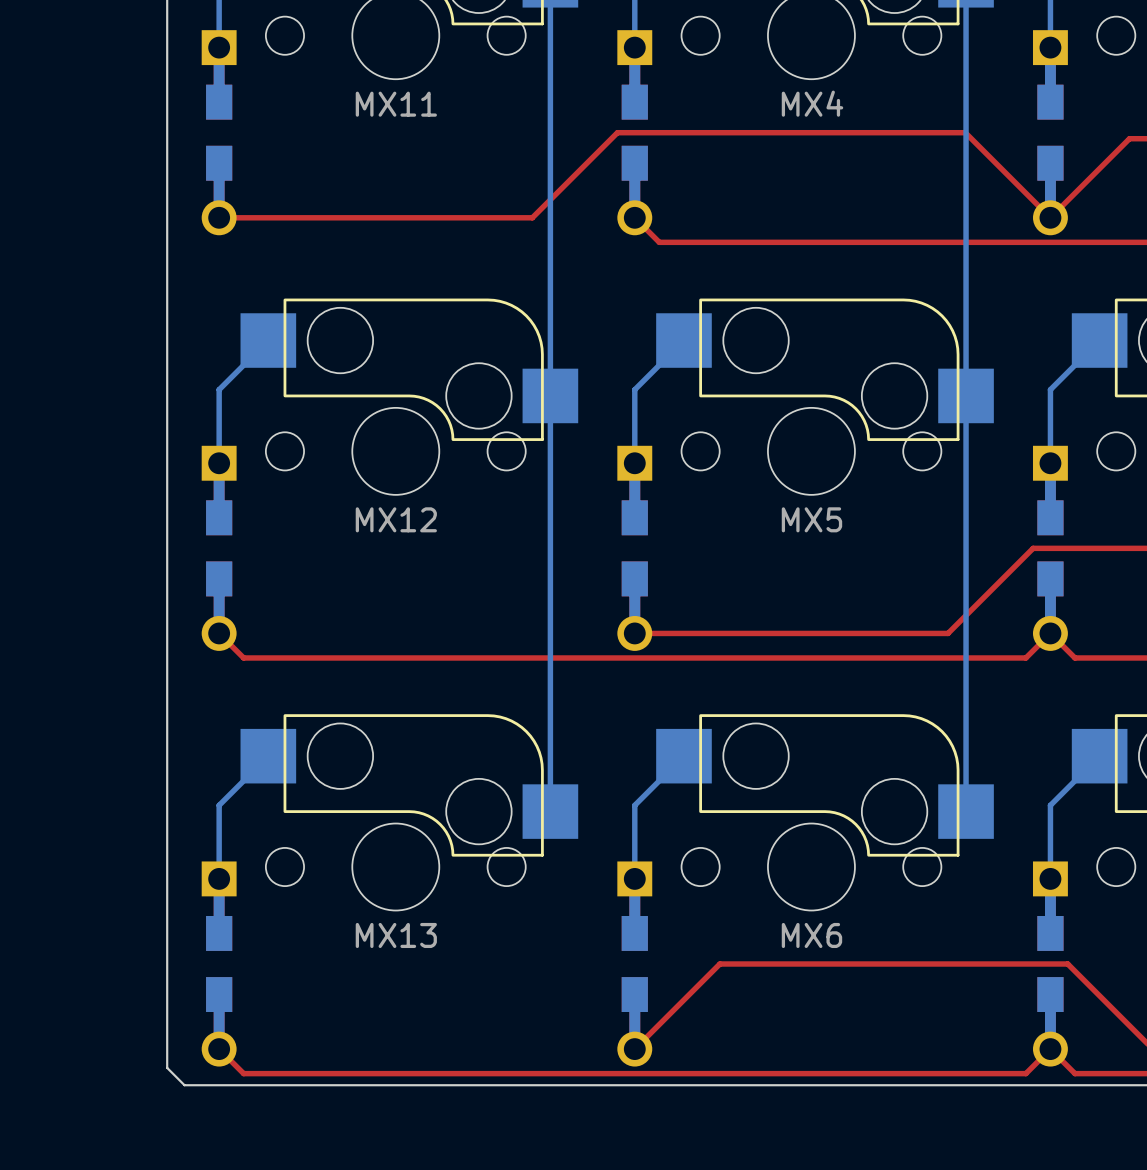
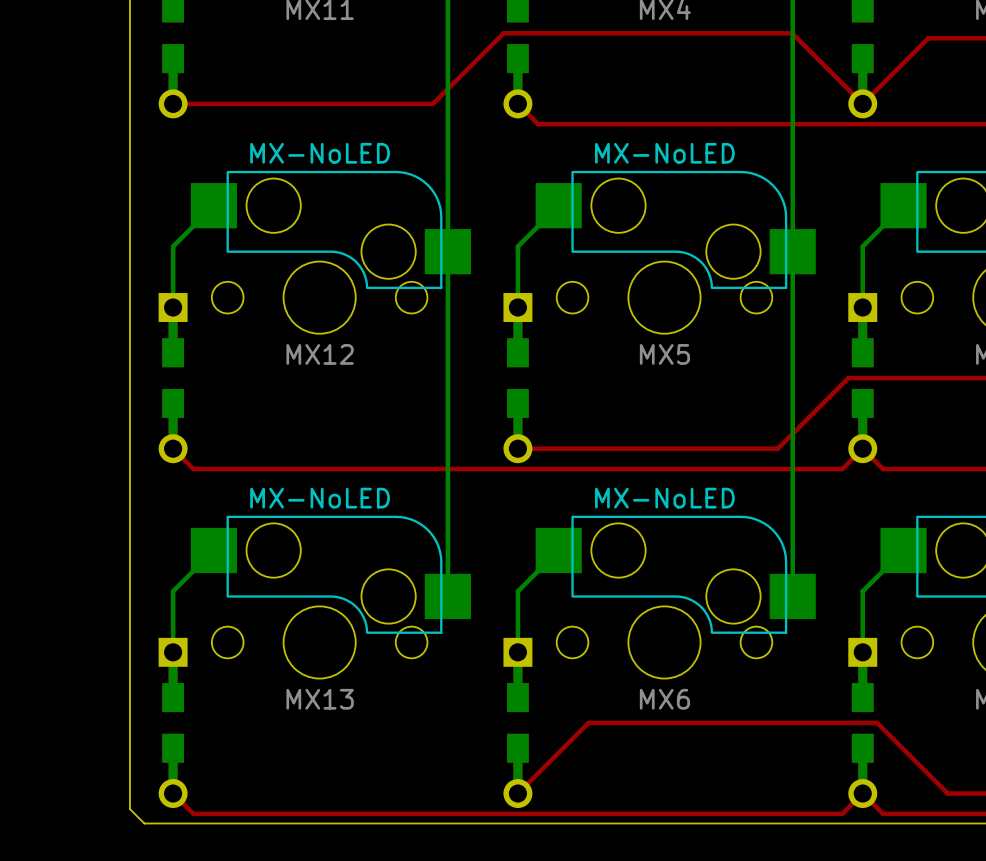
MX12 value: none -> MX-NoLED (320, 153)
MX5 value: none -> MX-NoLED (664, 153)
MX13 value: none -> MX-NoLED (320, 498)
MX6 value: none -> MX-NoLED (664, 498)

